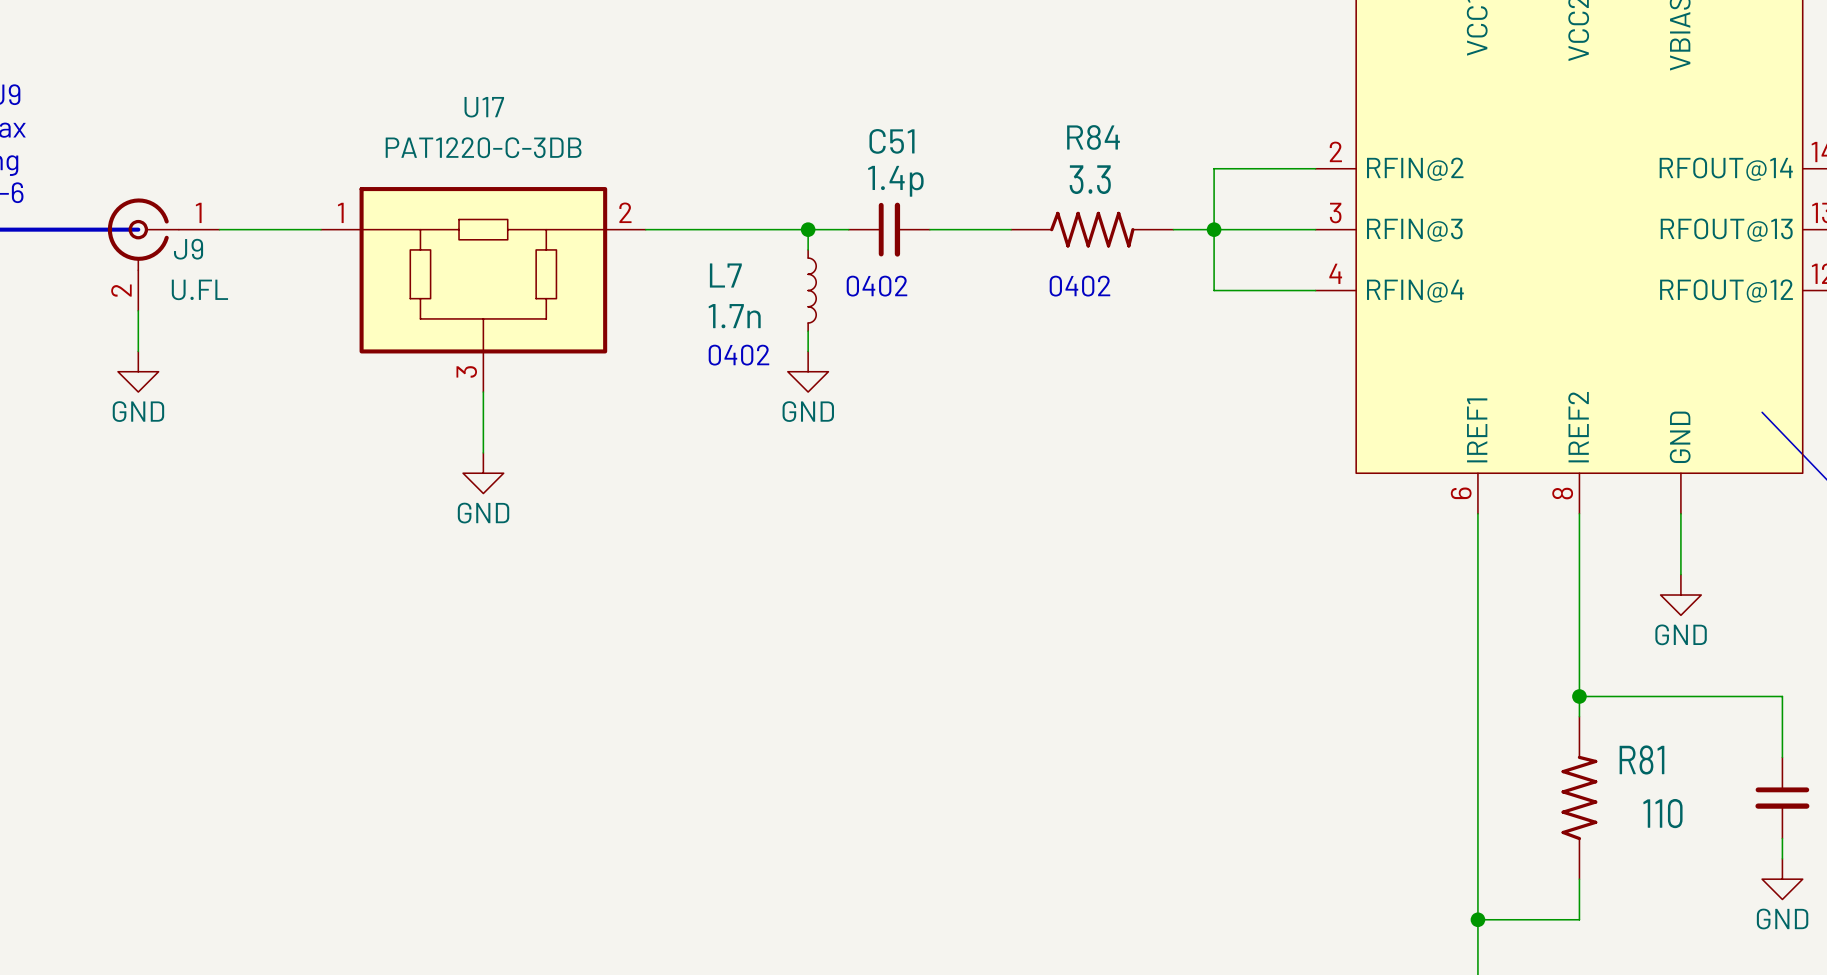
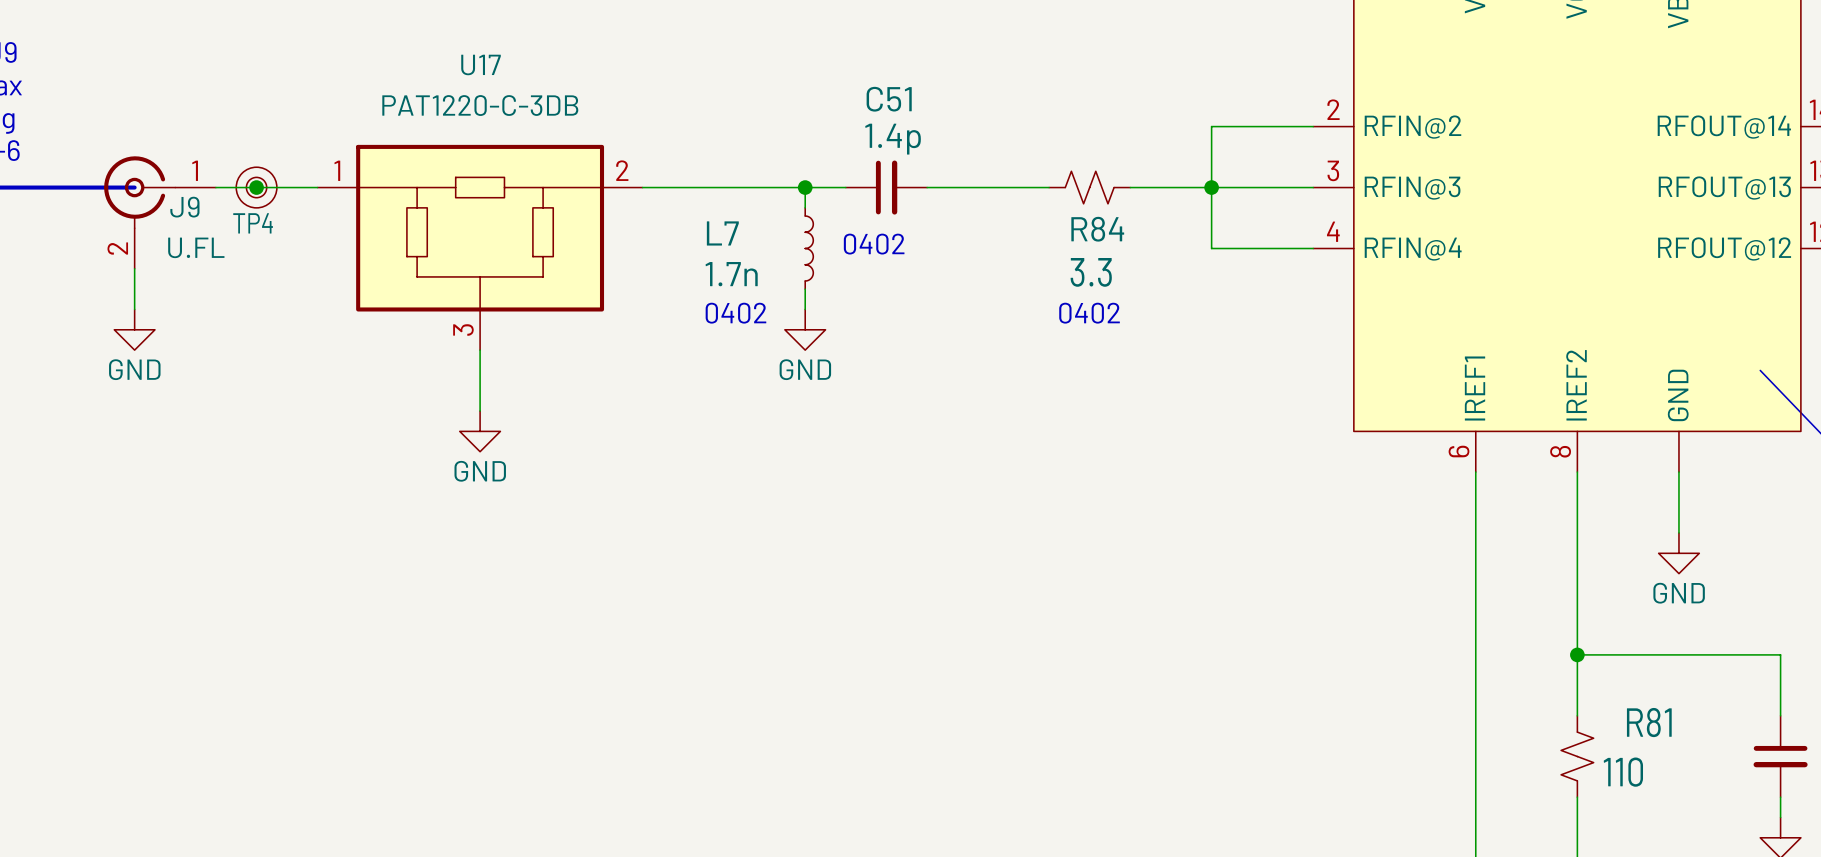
R84 name position: R84 (1093, 137) -> R84 (1097, 229)
R84 value position: 3.3 (1090, 179) -> 3.3 (1091, 272)
R84 symbol: [1011, 211, 1174, 248] -> [1049, 171, 1131, 204]
TP4: none -> (256, 187)
junction: none -> (256, 187)
text position: 0402 (1079, 286) -> 0402 (1089, 313)
R81 symbol: [1561, 716, 1598, 880] -> [1561, 715, 1594, 798]

